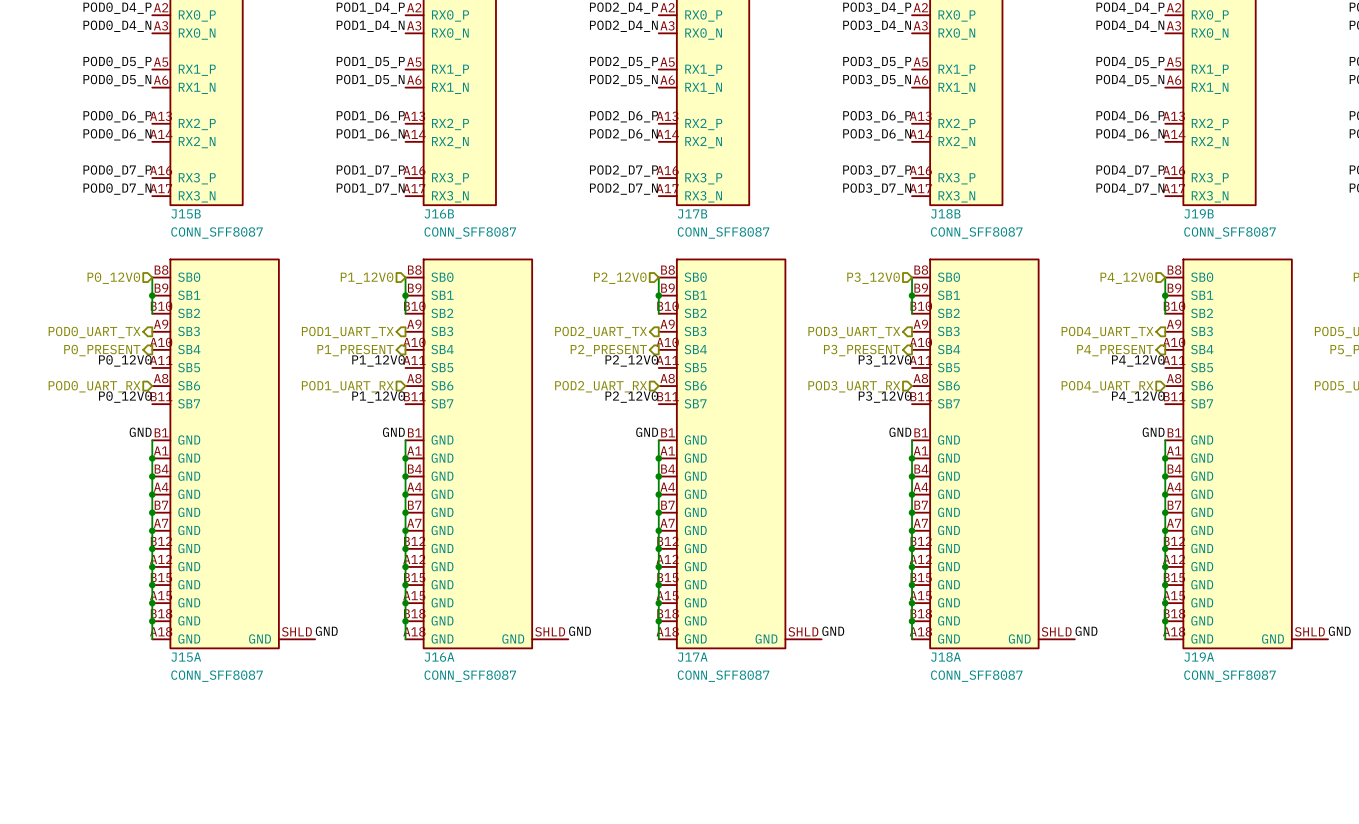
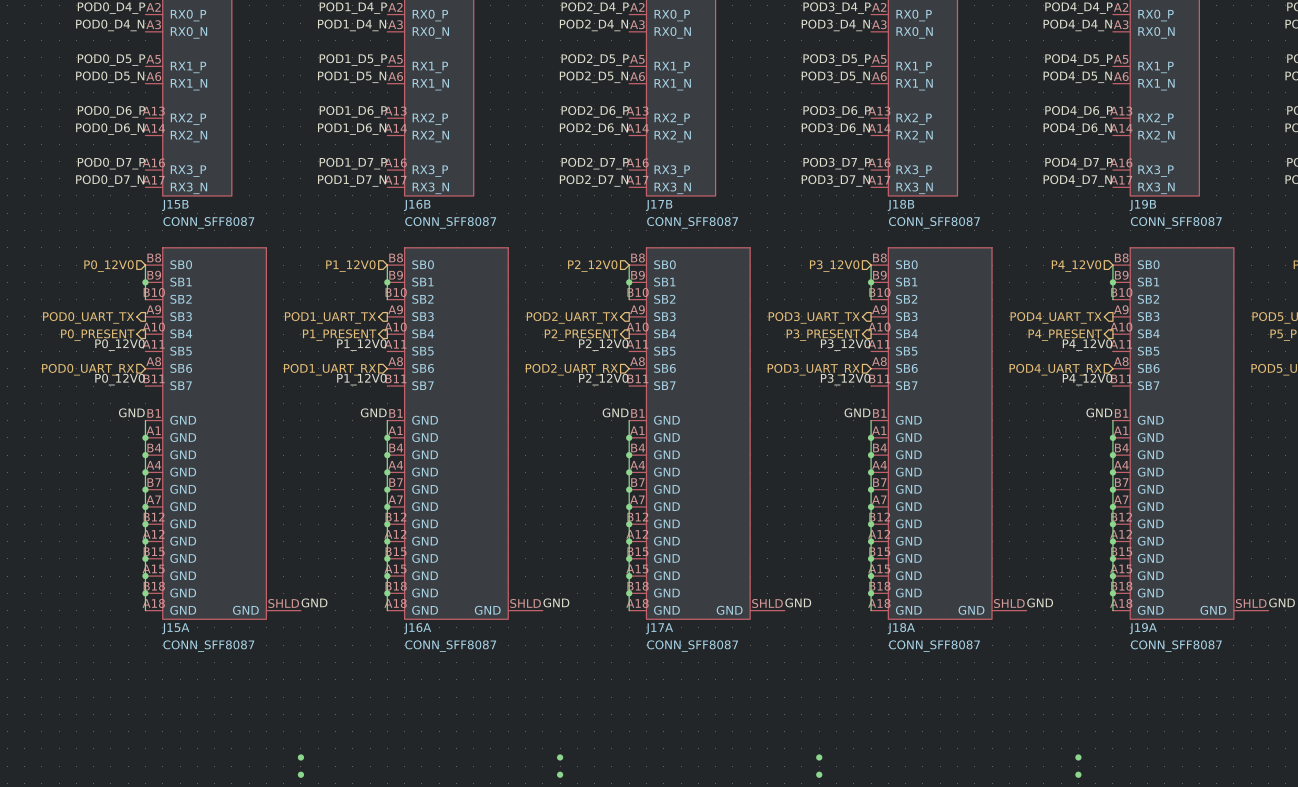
junction: none -> (300, 757)
junction: none -> (560, 757)
junction: none -> (819, 757)
junction: none -> (1078, 757)
junction: none -> (300, 774)
junction: none -> (560, 774)
junction: none -> (819, 774)
junction: none -> (1078, 774)

